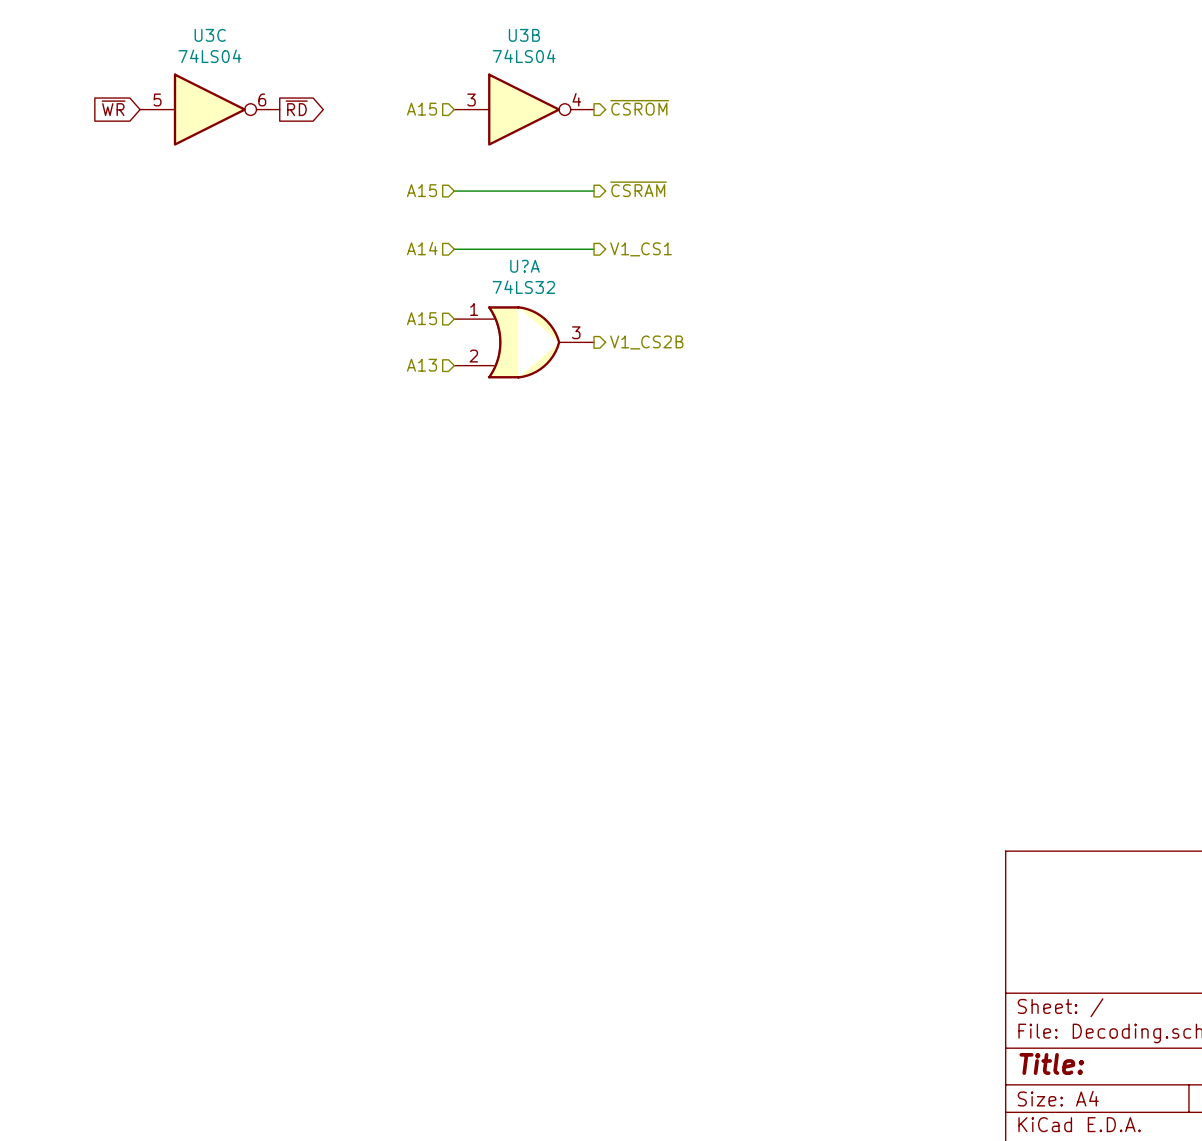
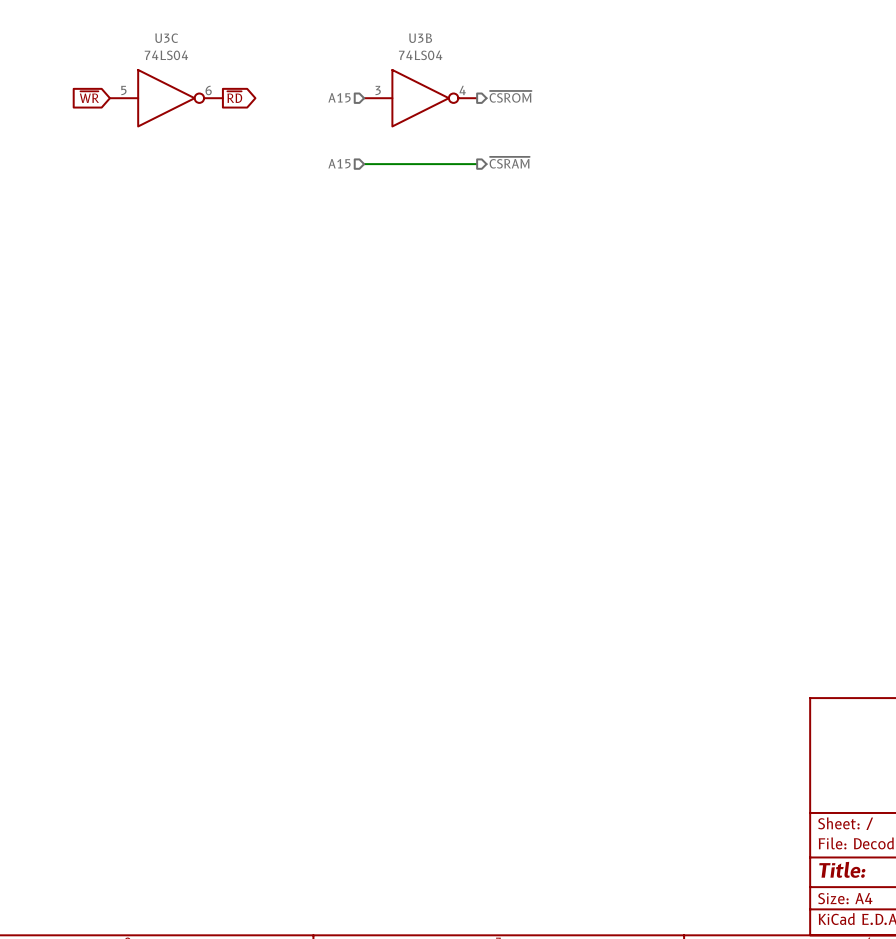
hierarchical label: A14 (422, 248) -> none
wire: (454, 249) (593, 249) -> none
hierarchical label: V1_CS1 (641, 249) -> none
hierarchical label: A15 (422, 318) -> none
U?A: 74LS32 (524, 342) -> none
hierarchical label: V1_CS2B (646, 342) -> none
hierarchical label: A13 (422, 365) -> none

